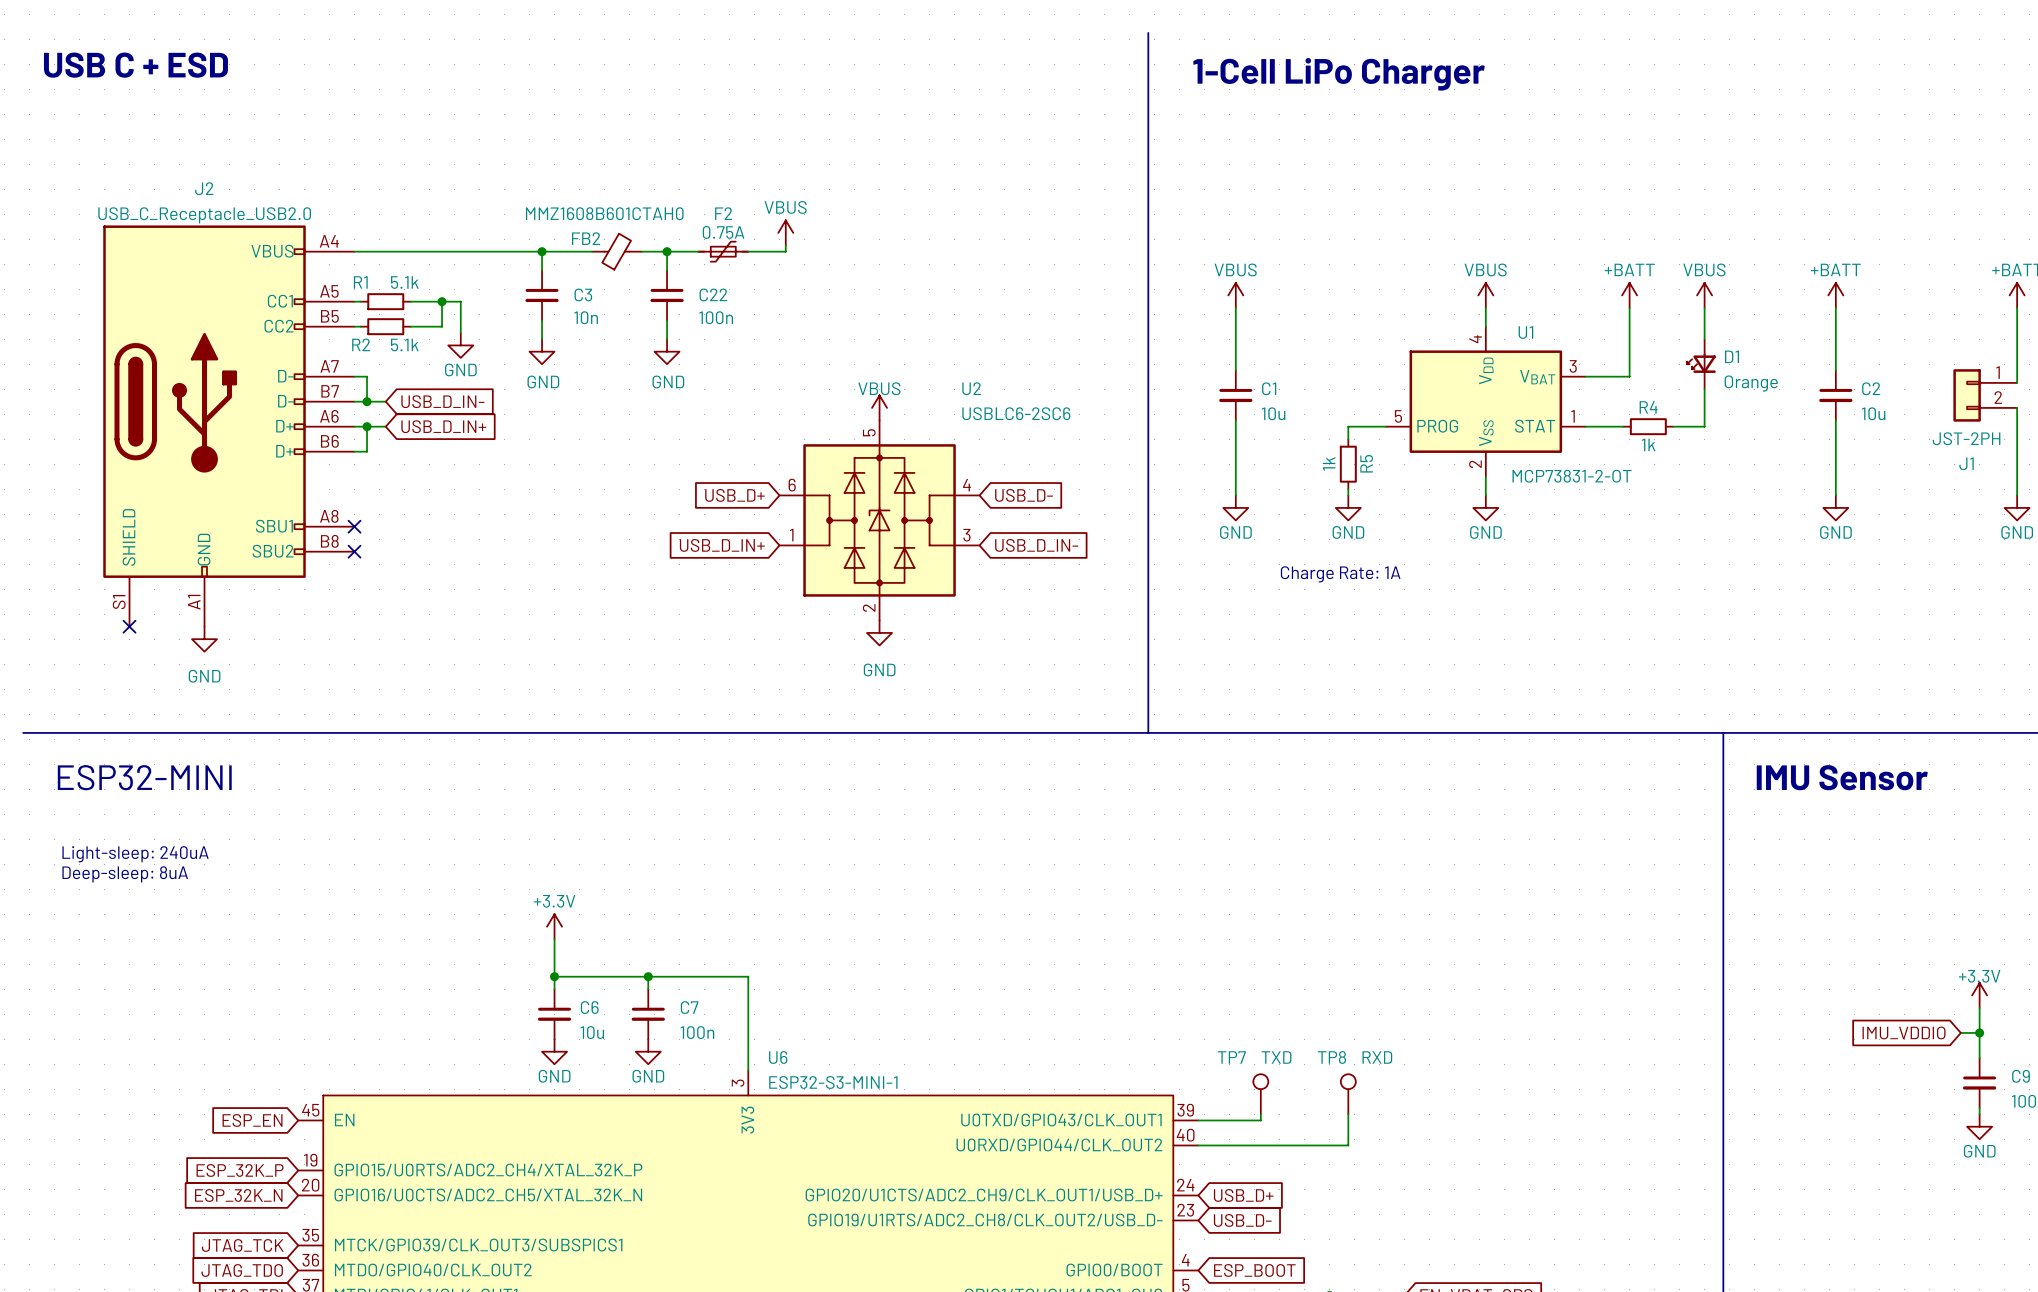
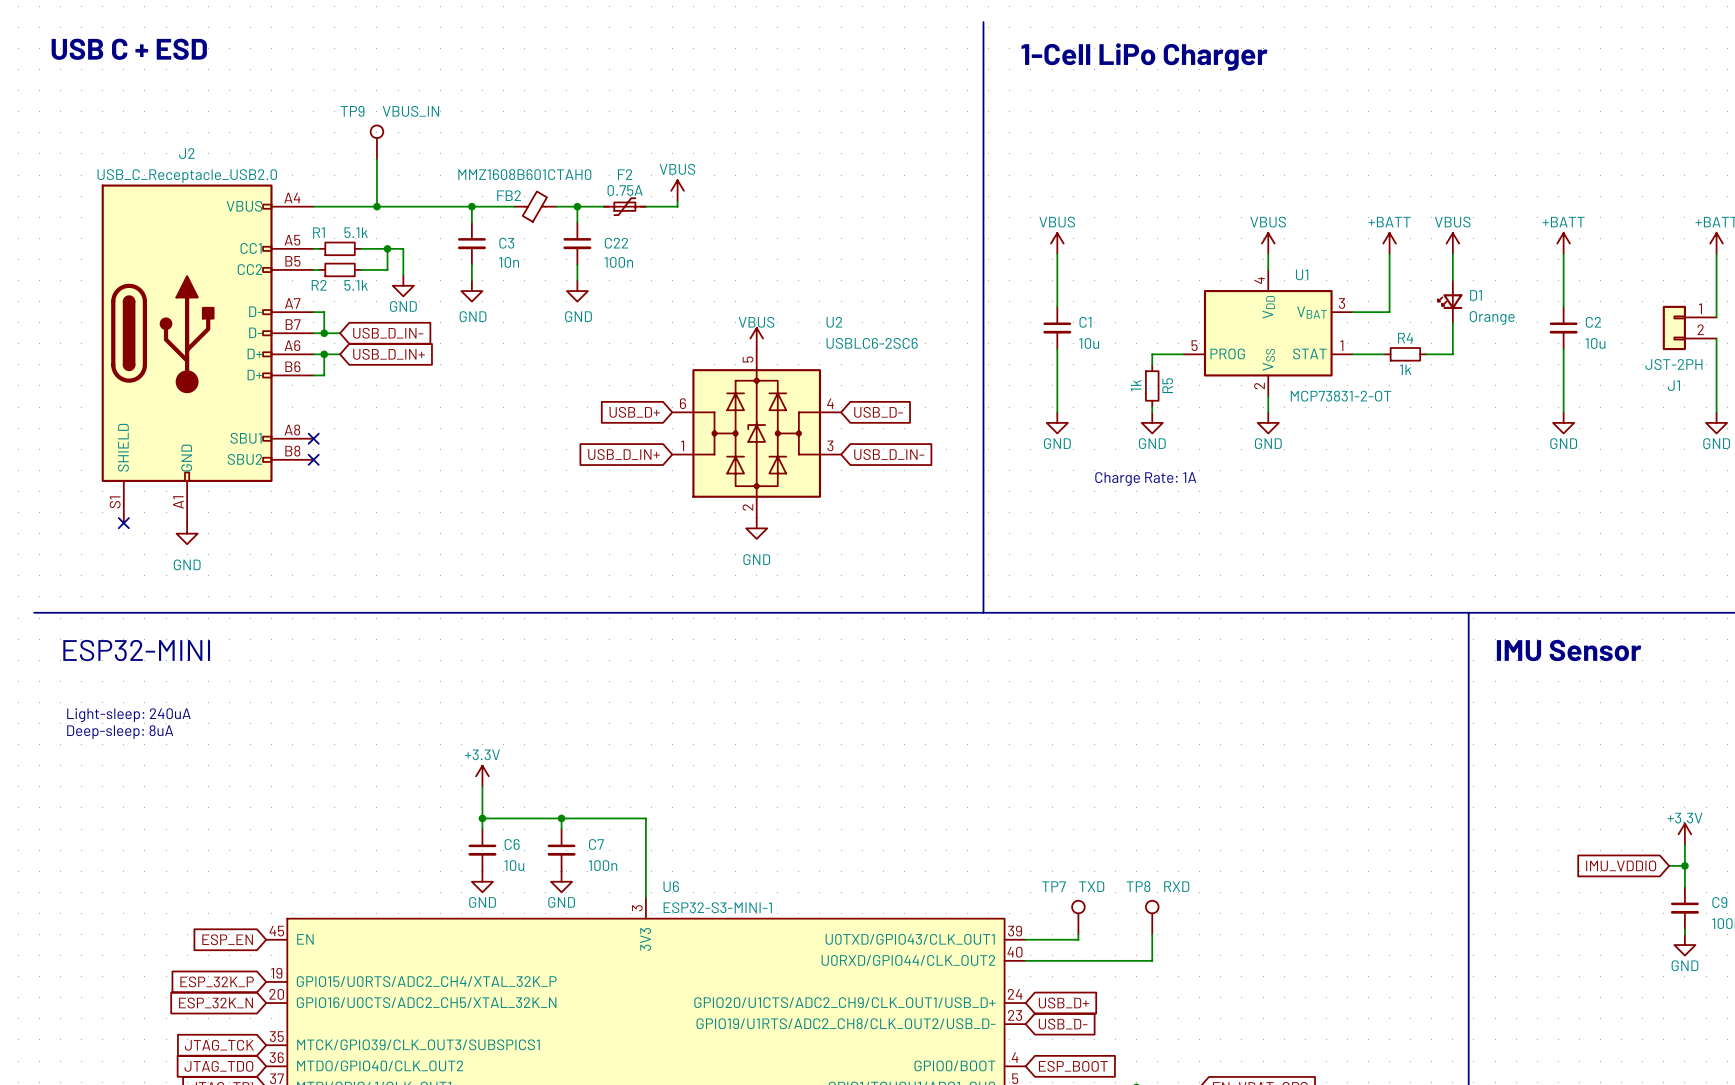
TP9: none -> VBUS_IN (376, 142)
wire: none -> (376, 159) (376, 206)
junction: none -> (376, 206)

